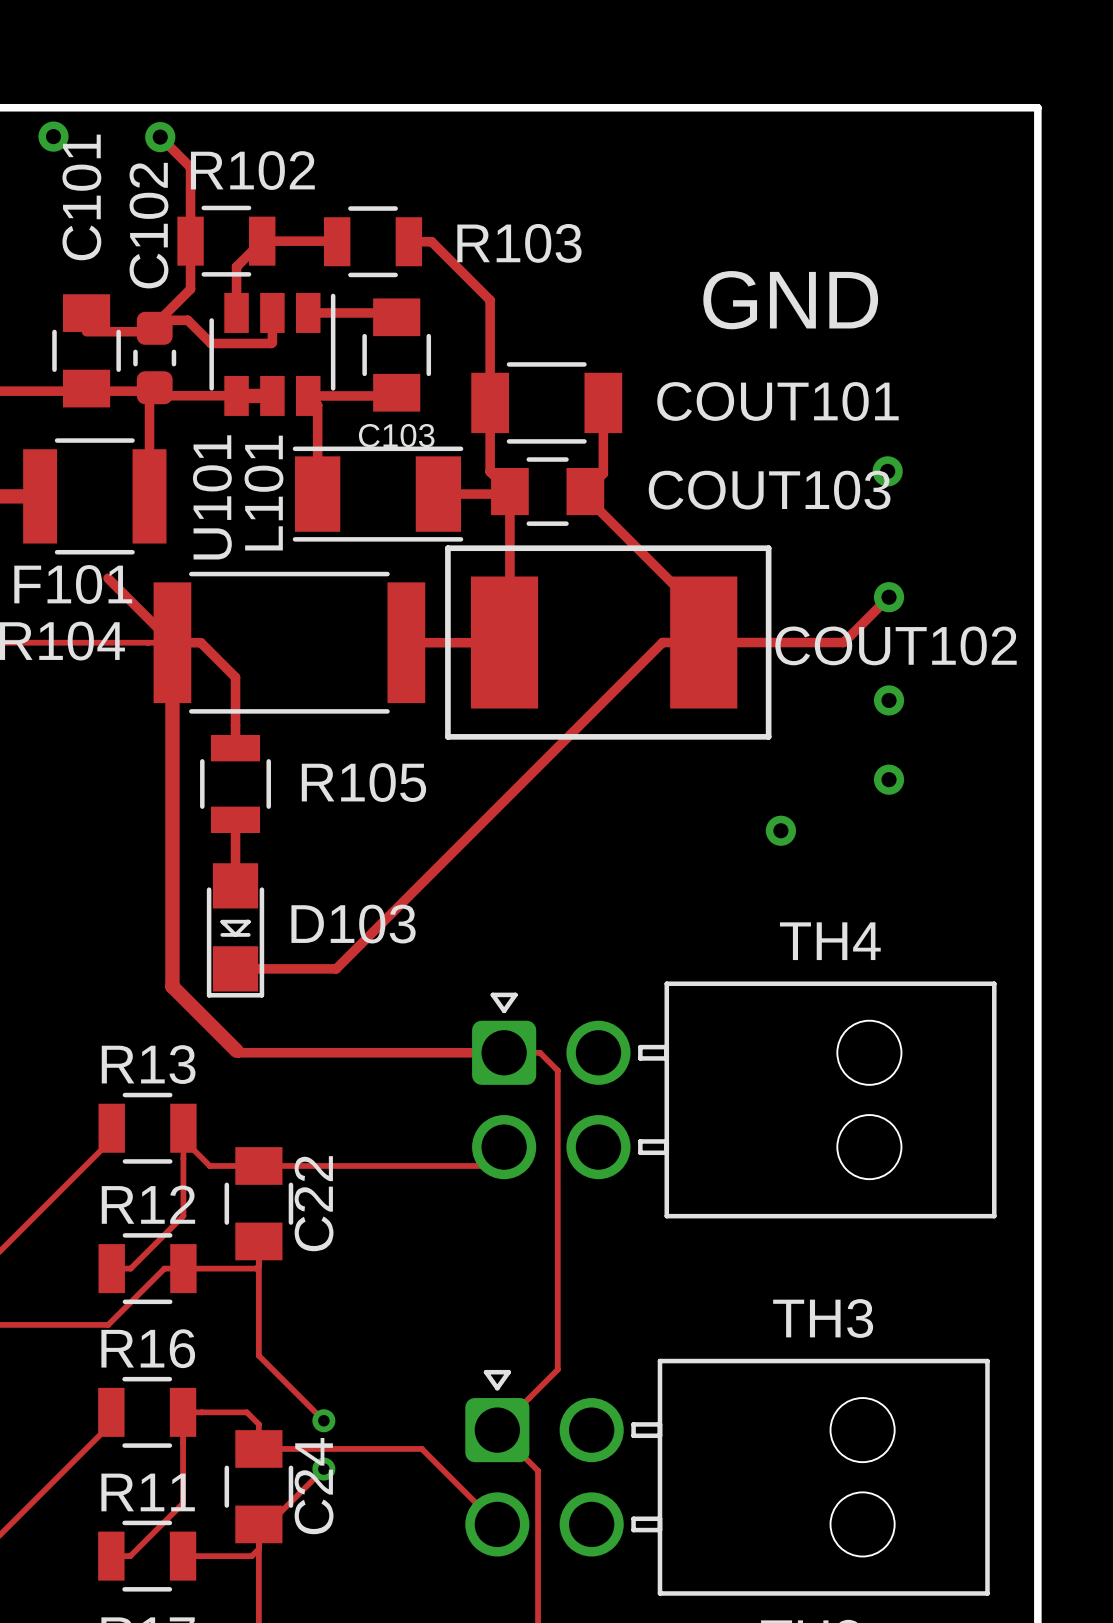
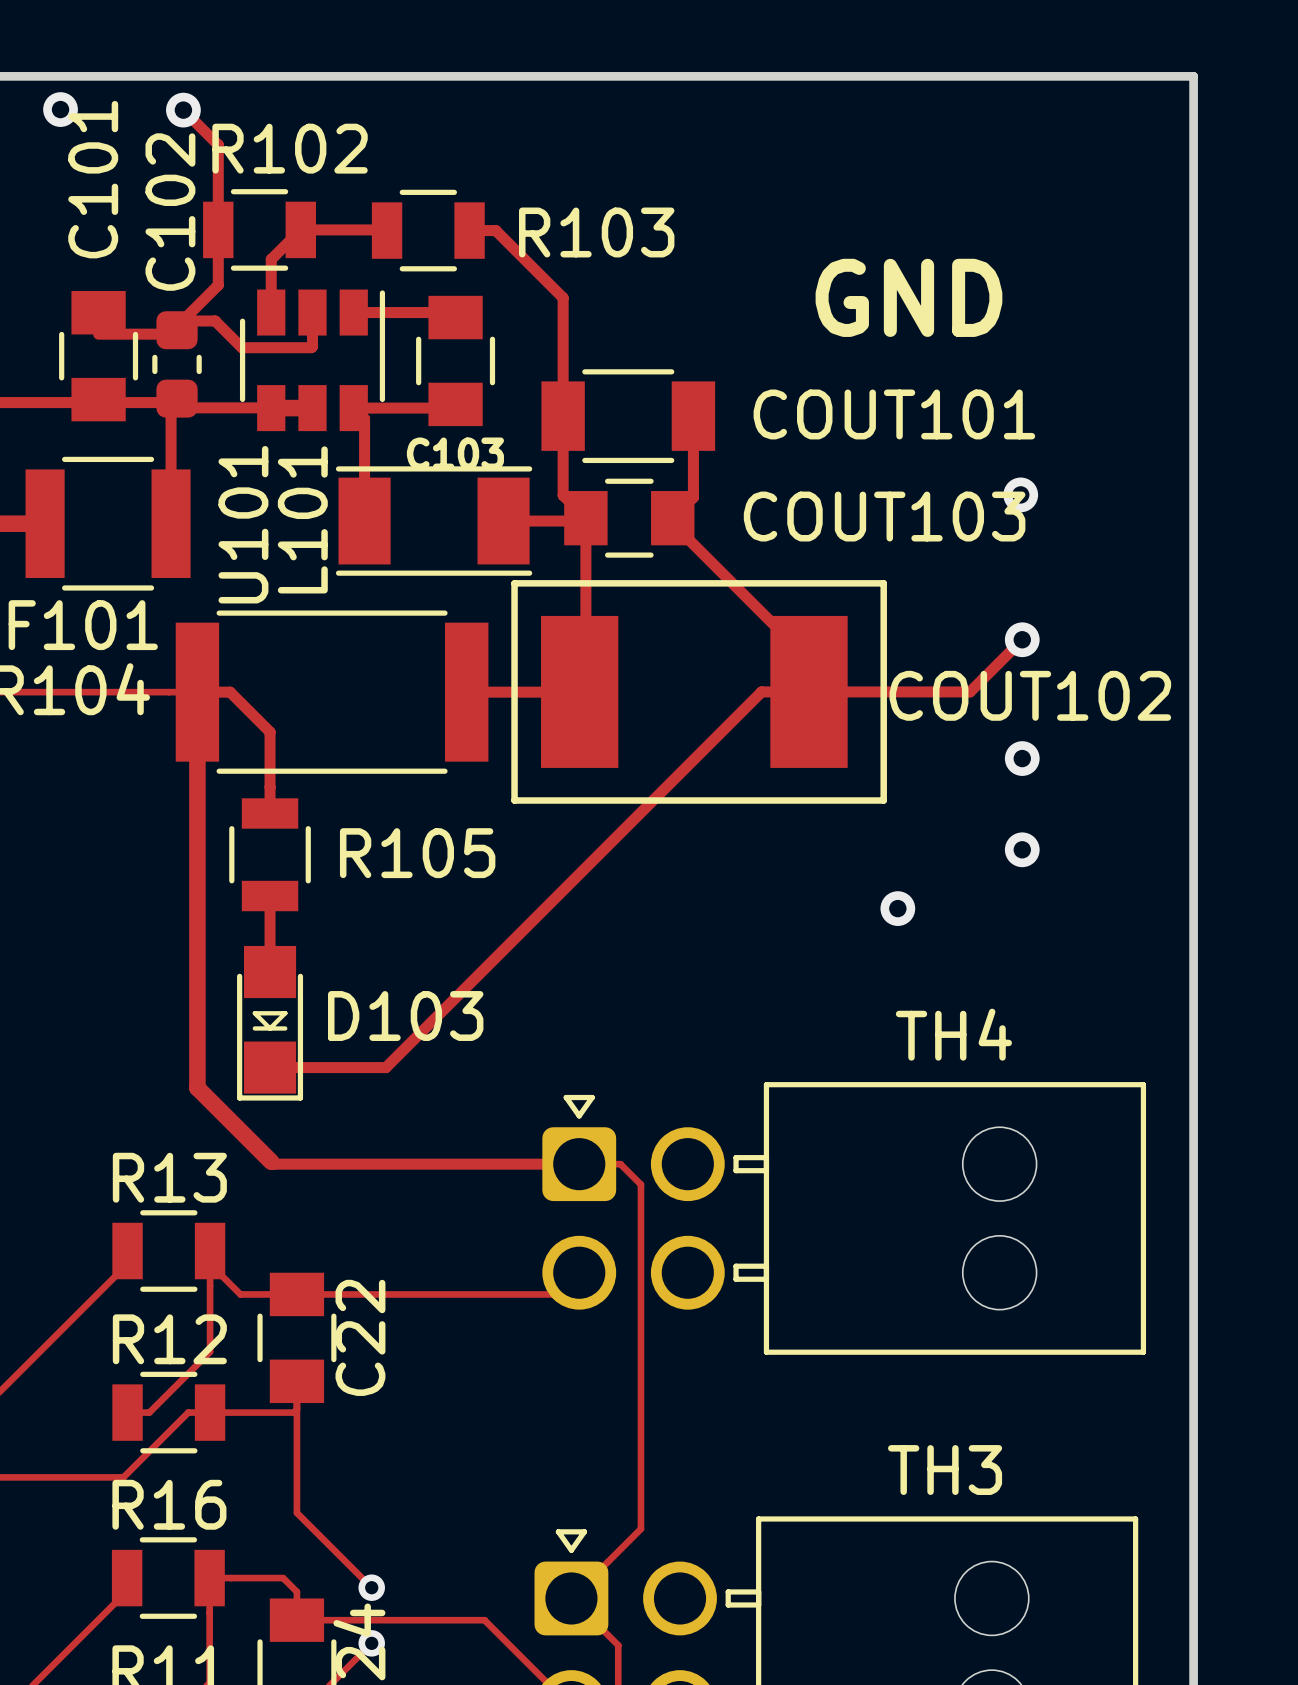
track: (108, 578) (172, 642) -> none

